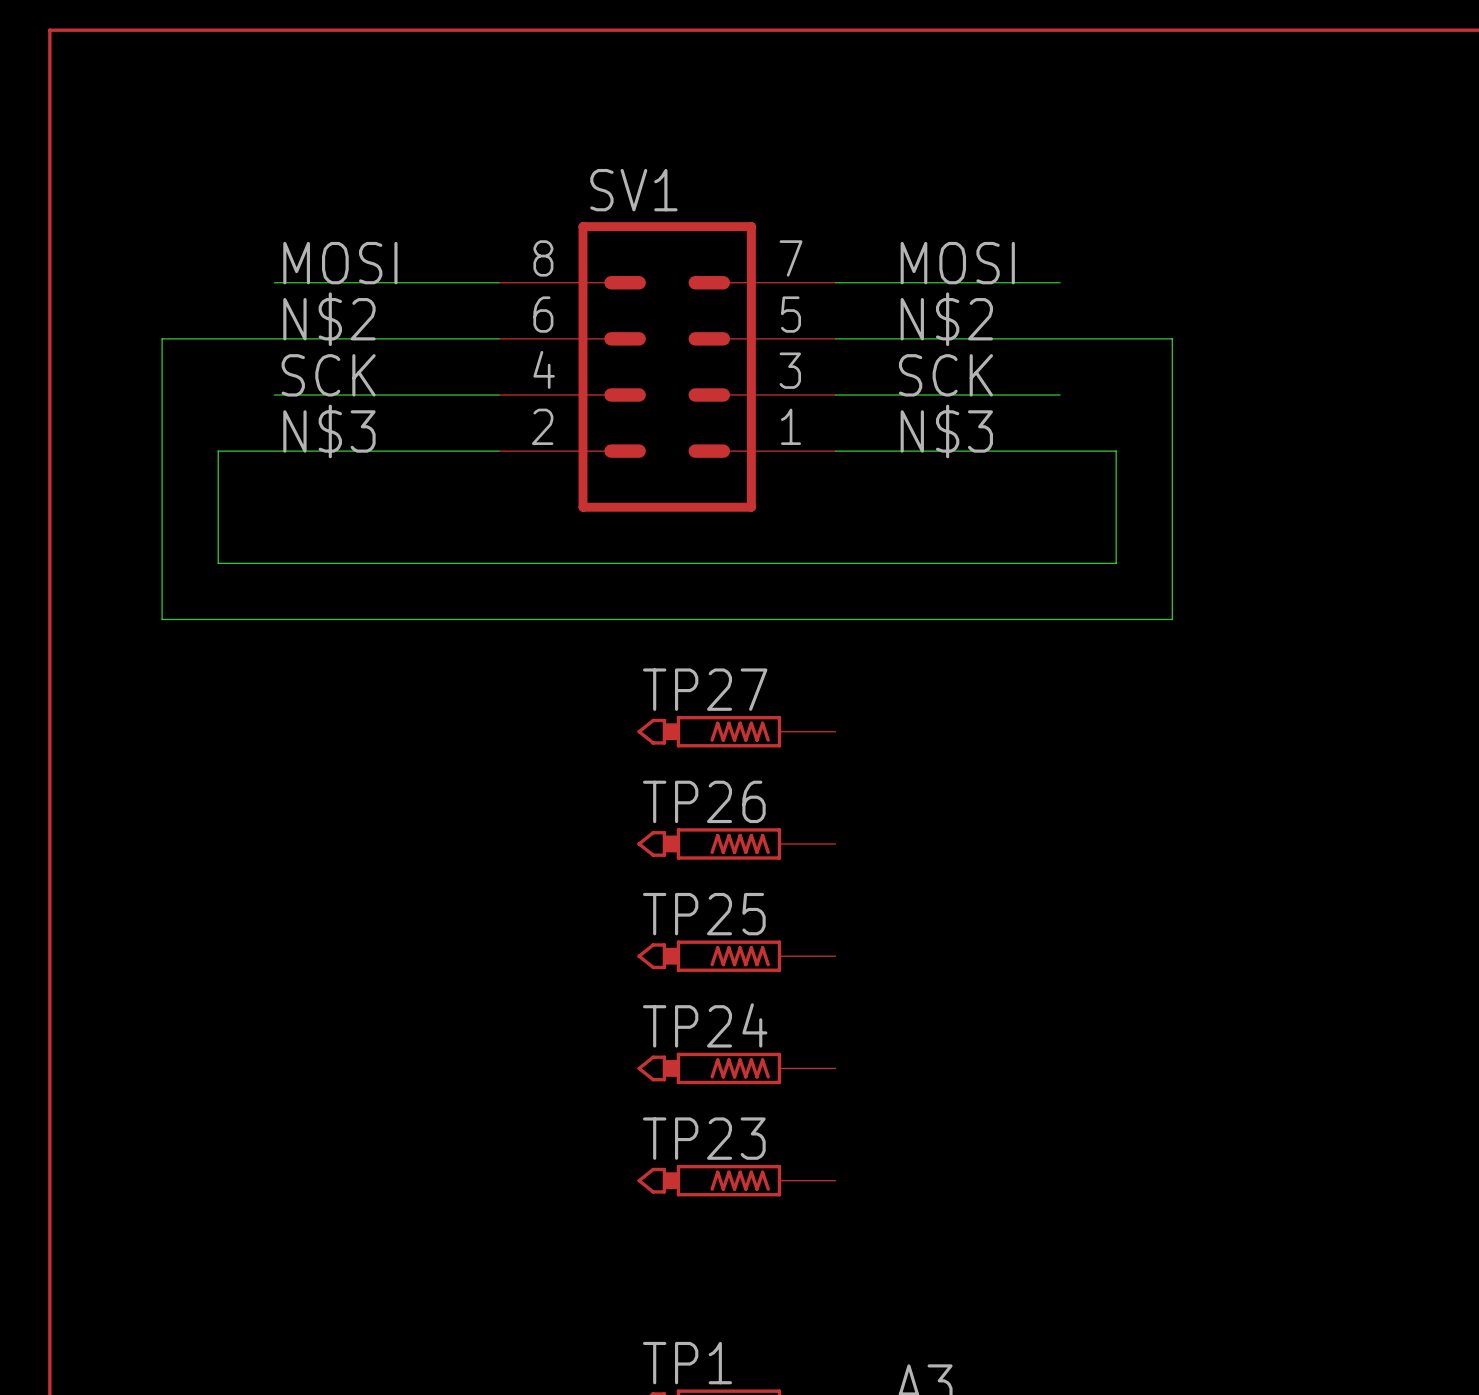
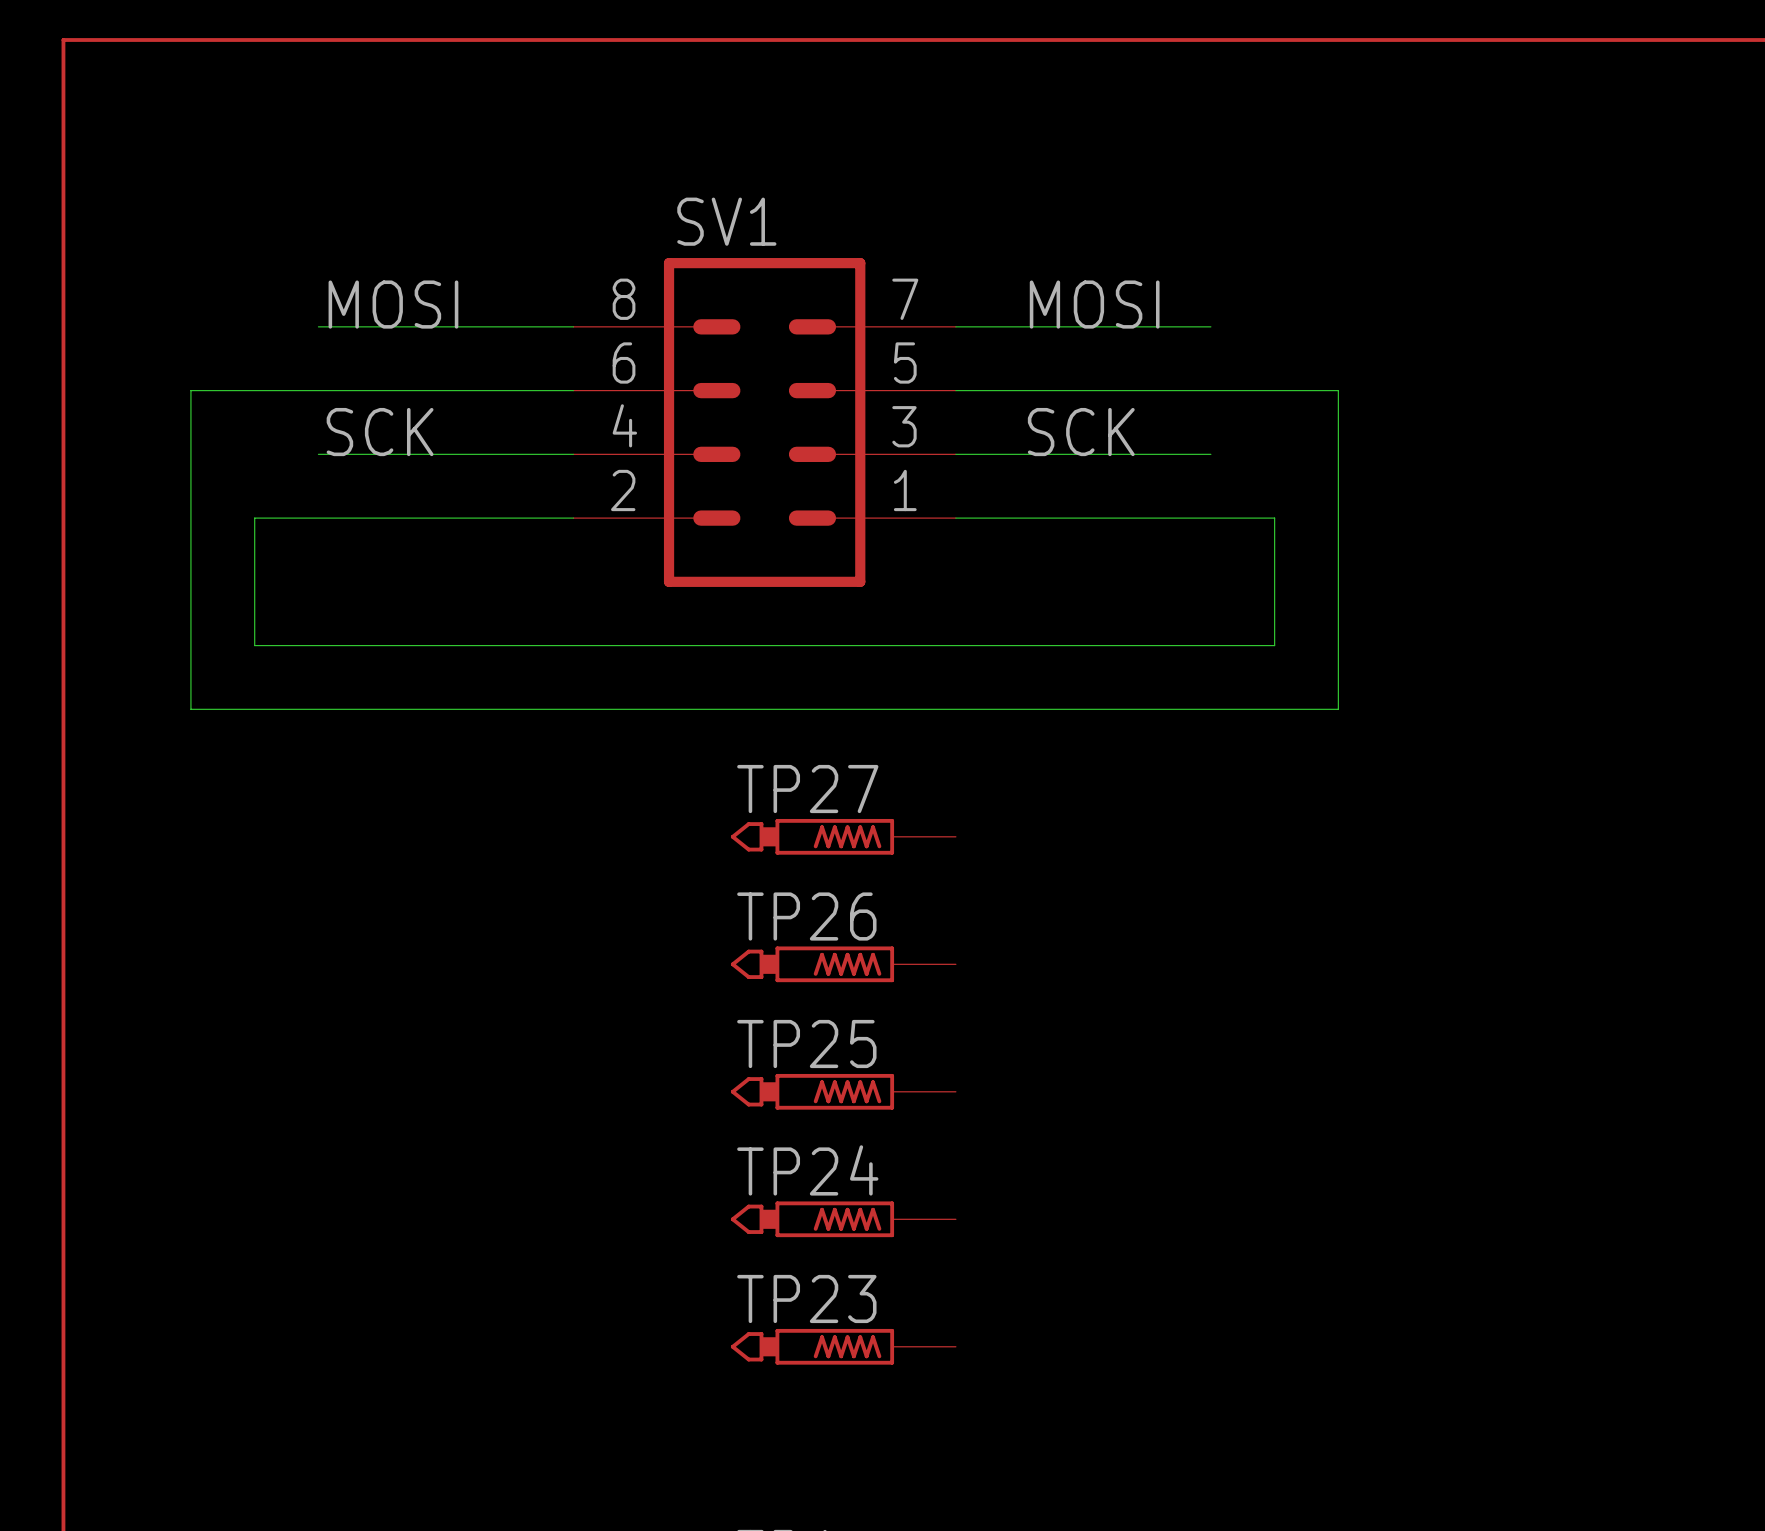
label: N$2 (329, 319) -> none
label: N$2 (946, 319) -> none
label: N$3 (329, 431) -> none
label: N$3 (946, 431) -> none

